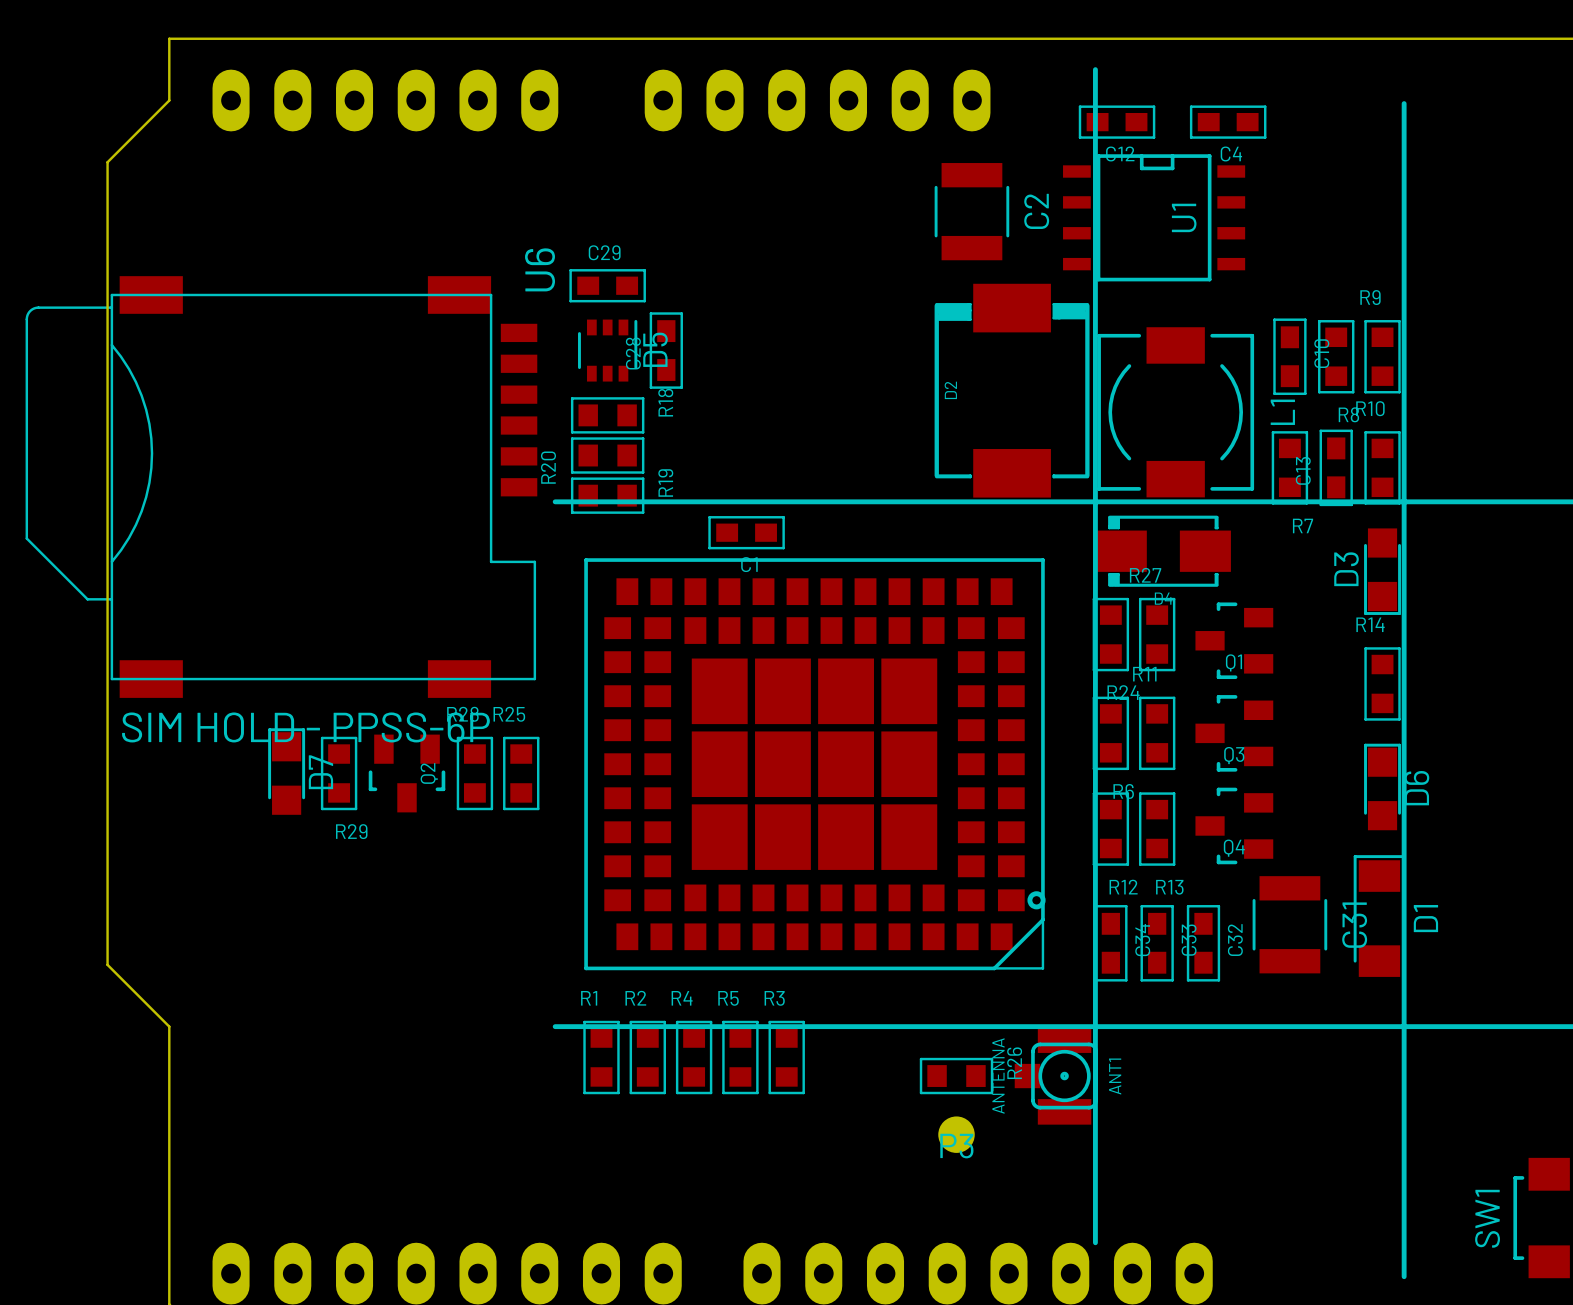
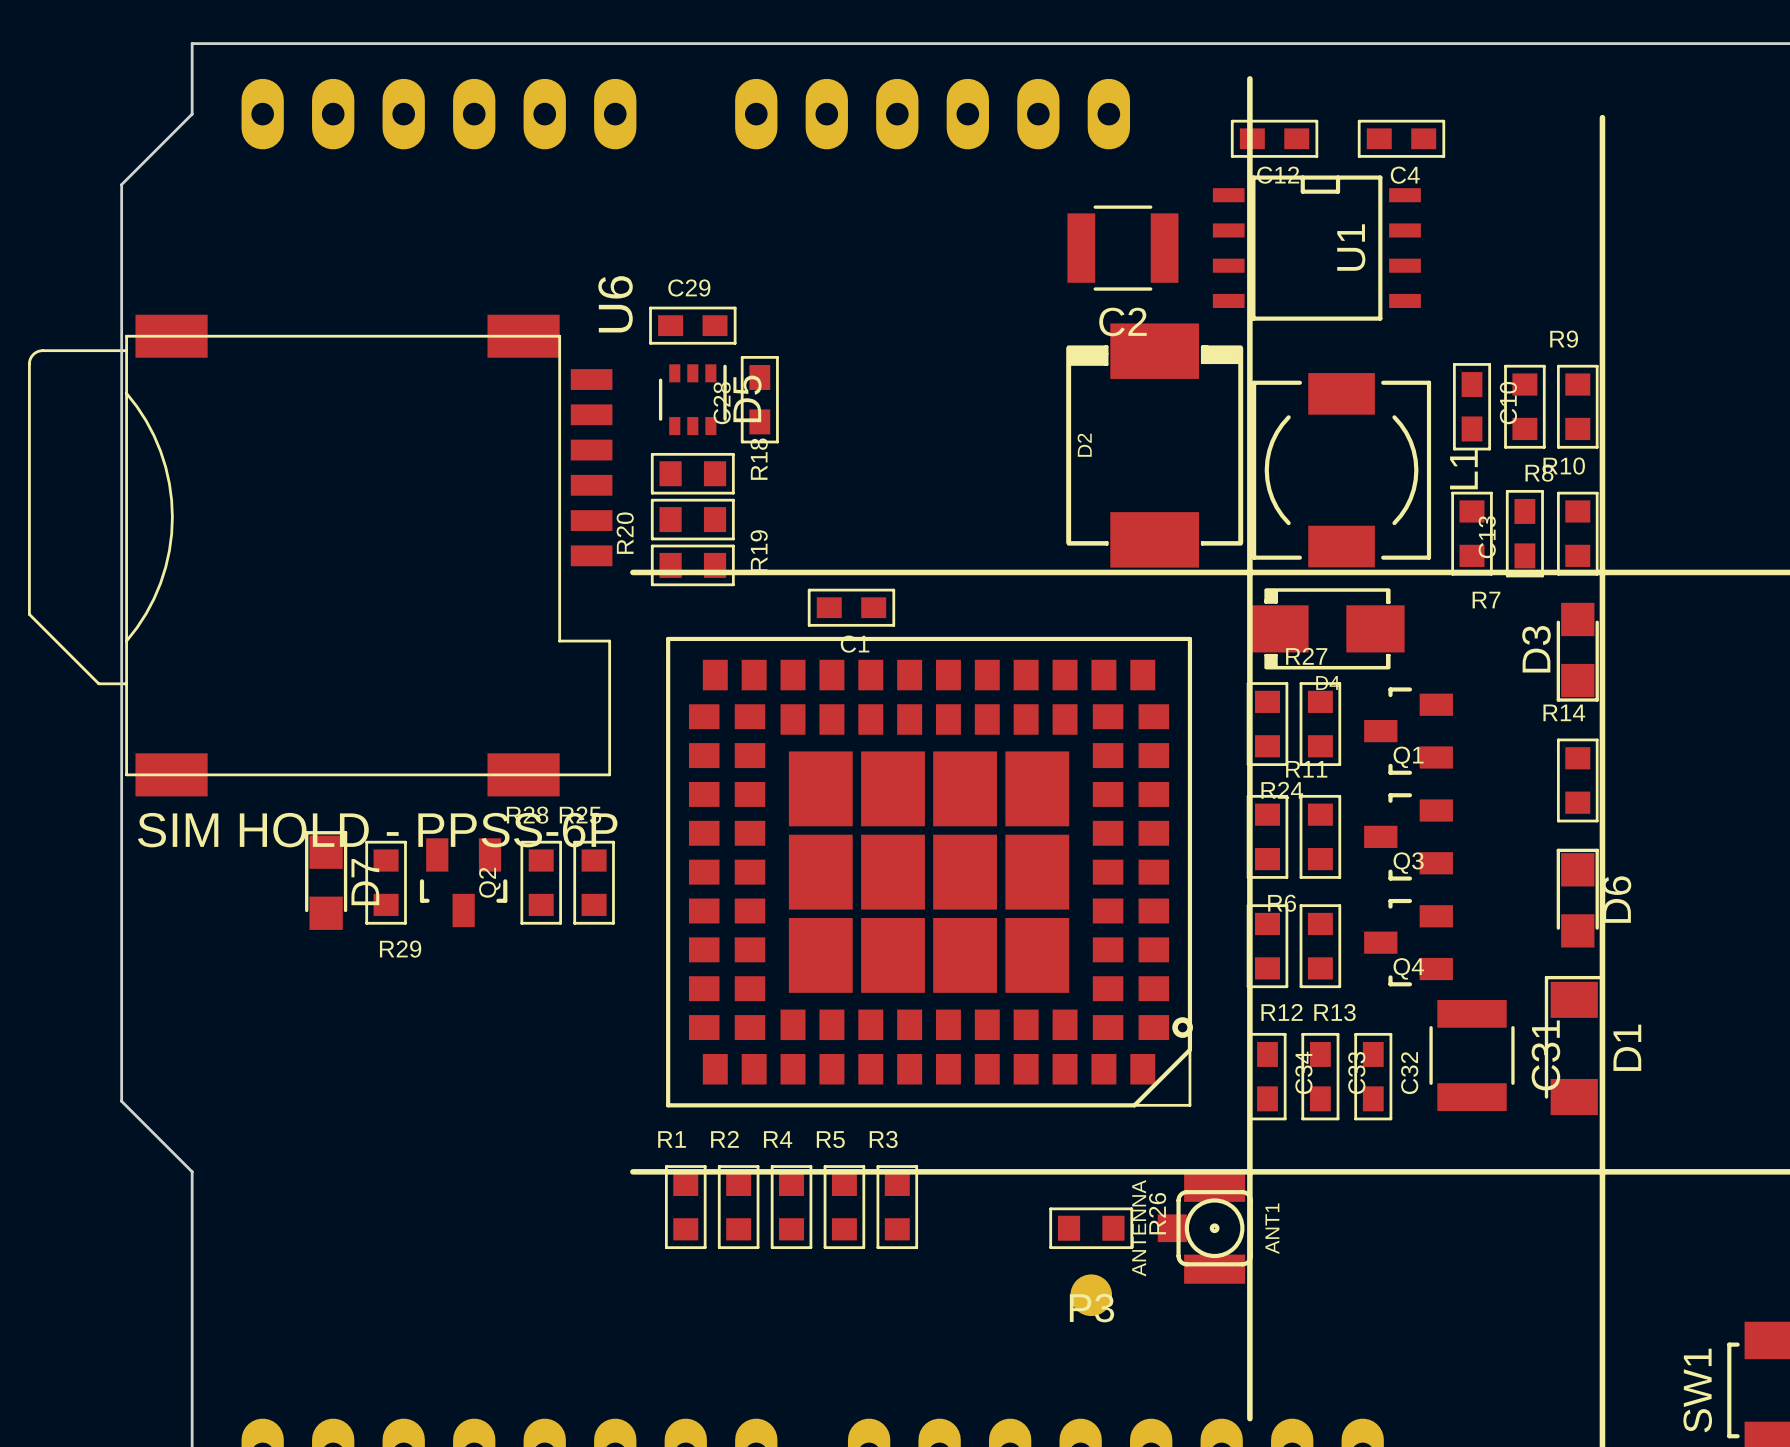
C2 rotation: 0° (971, 211) -> 90° clockwise (1122, 248)

